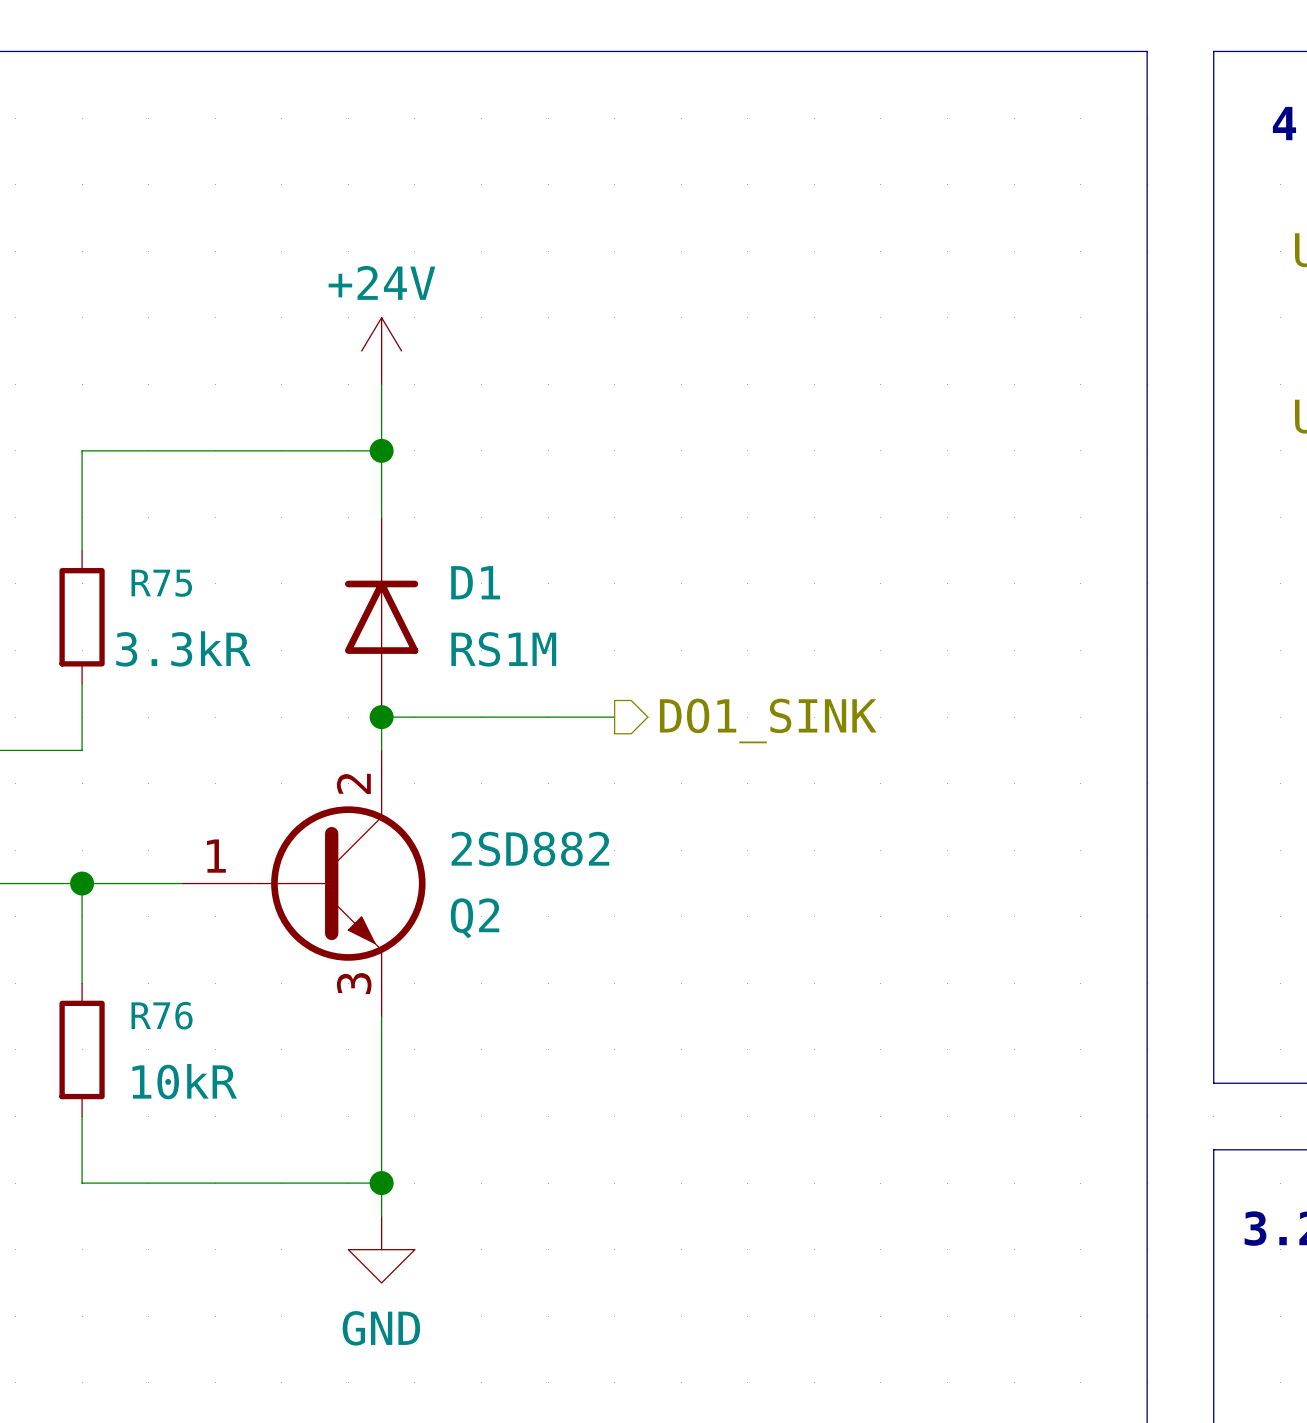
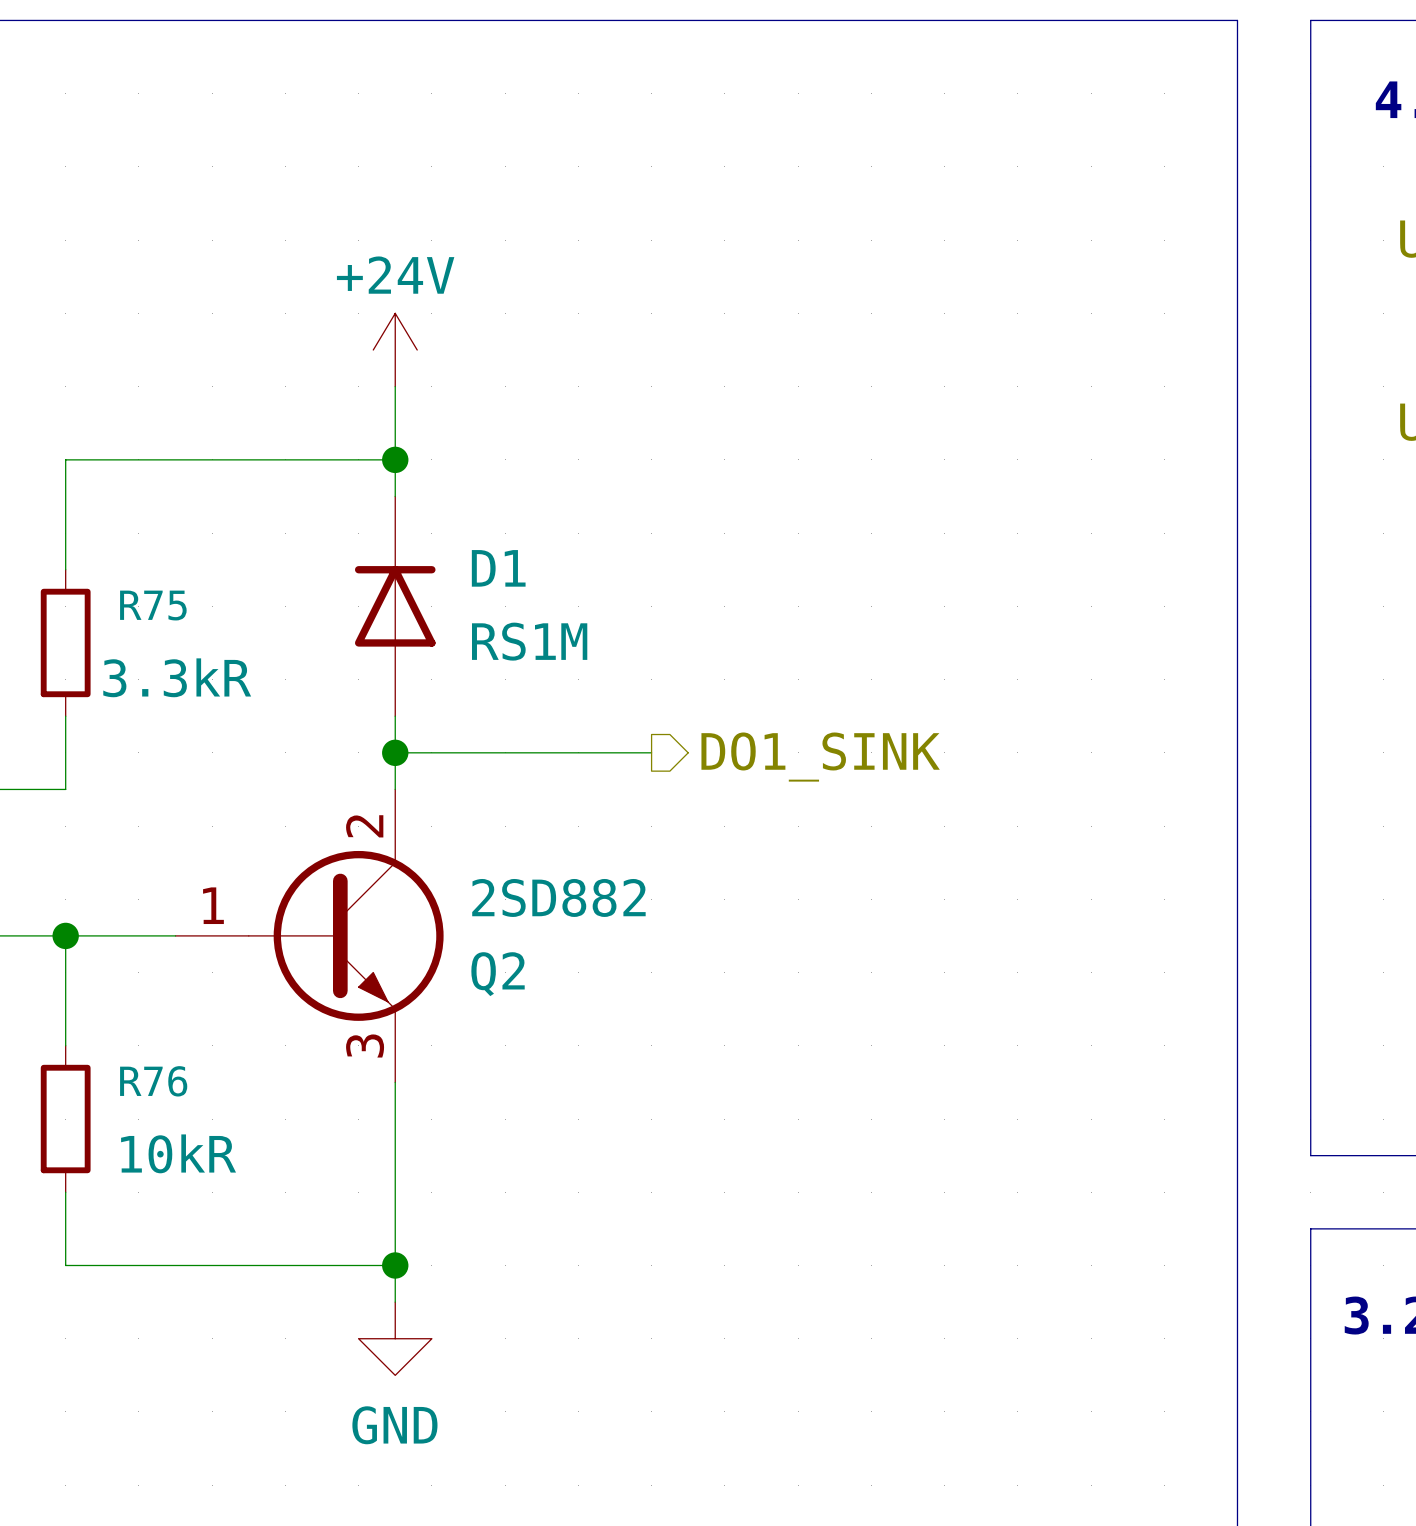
D1 position: (381, 617) -> (395, 606)

